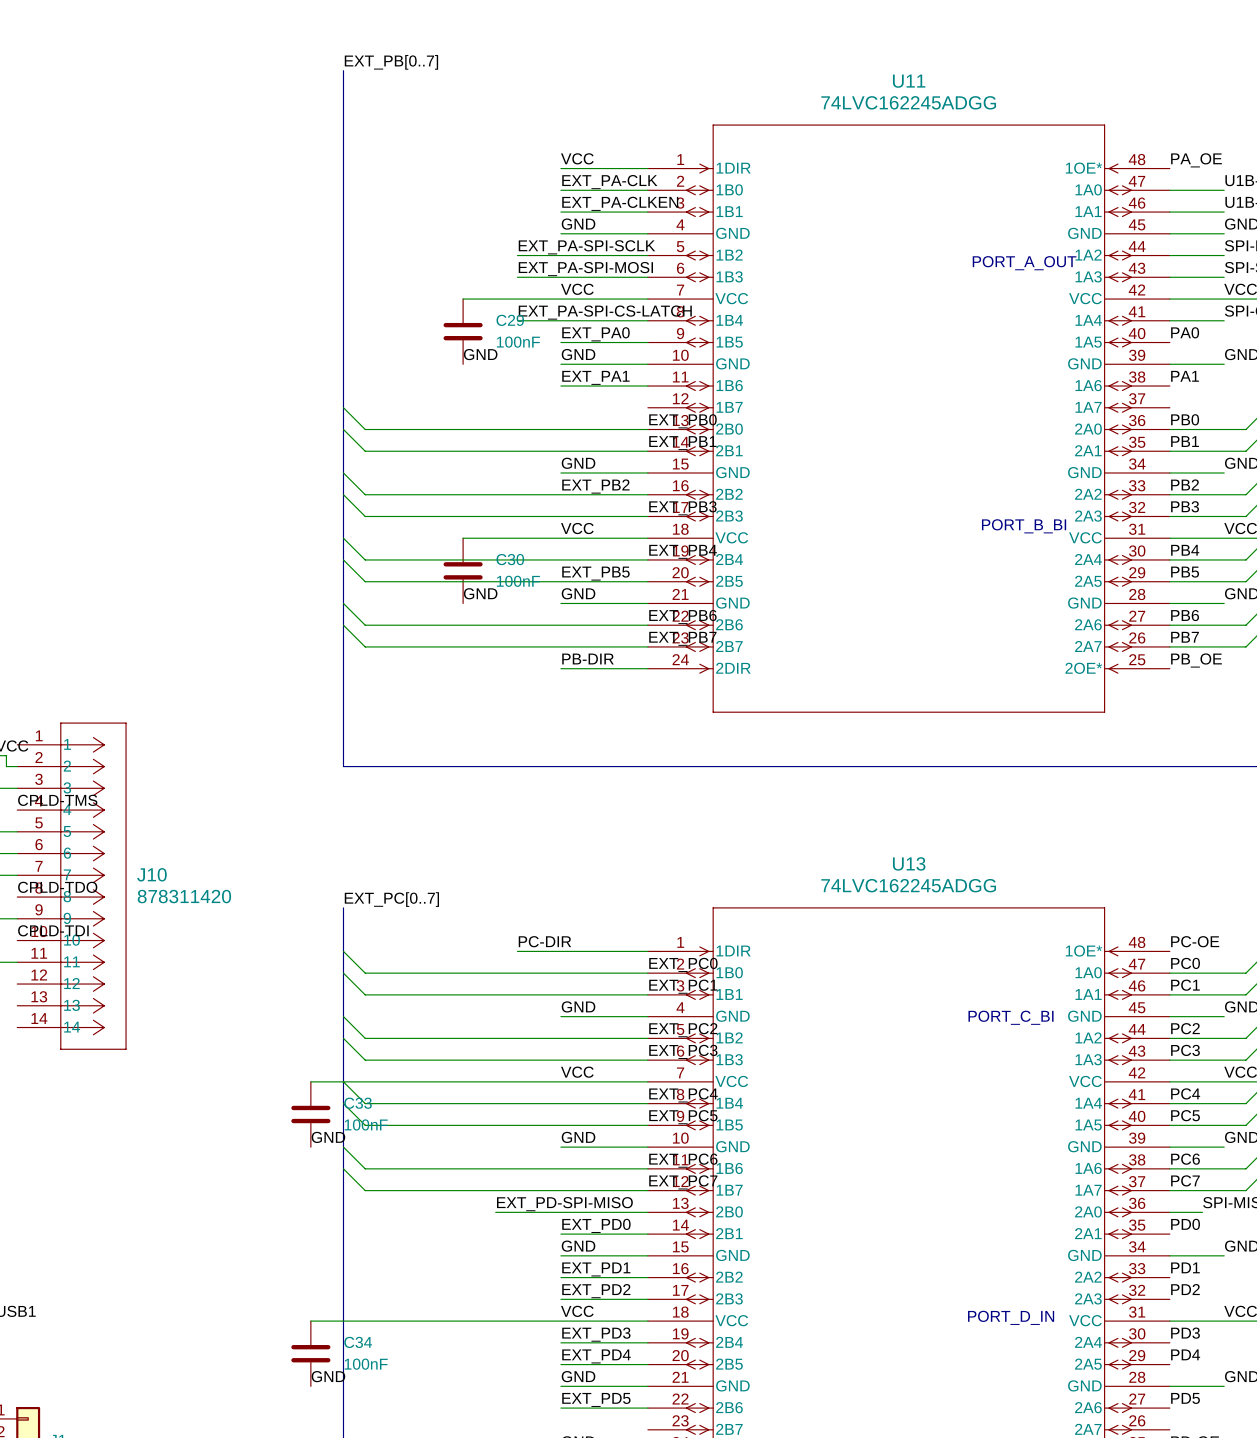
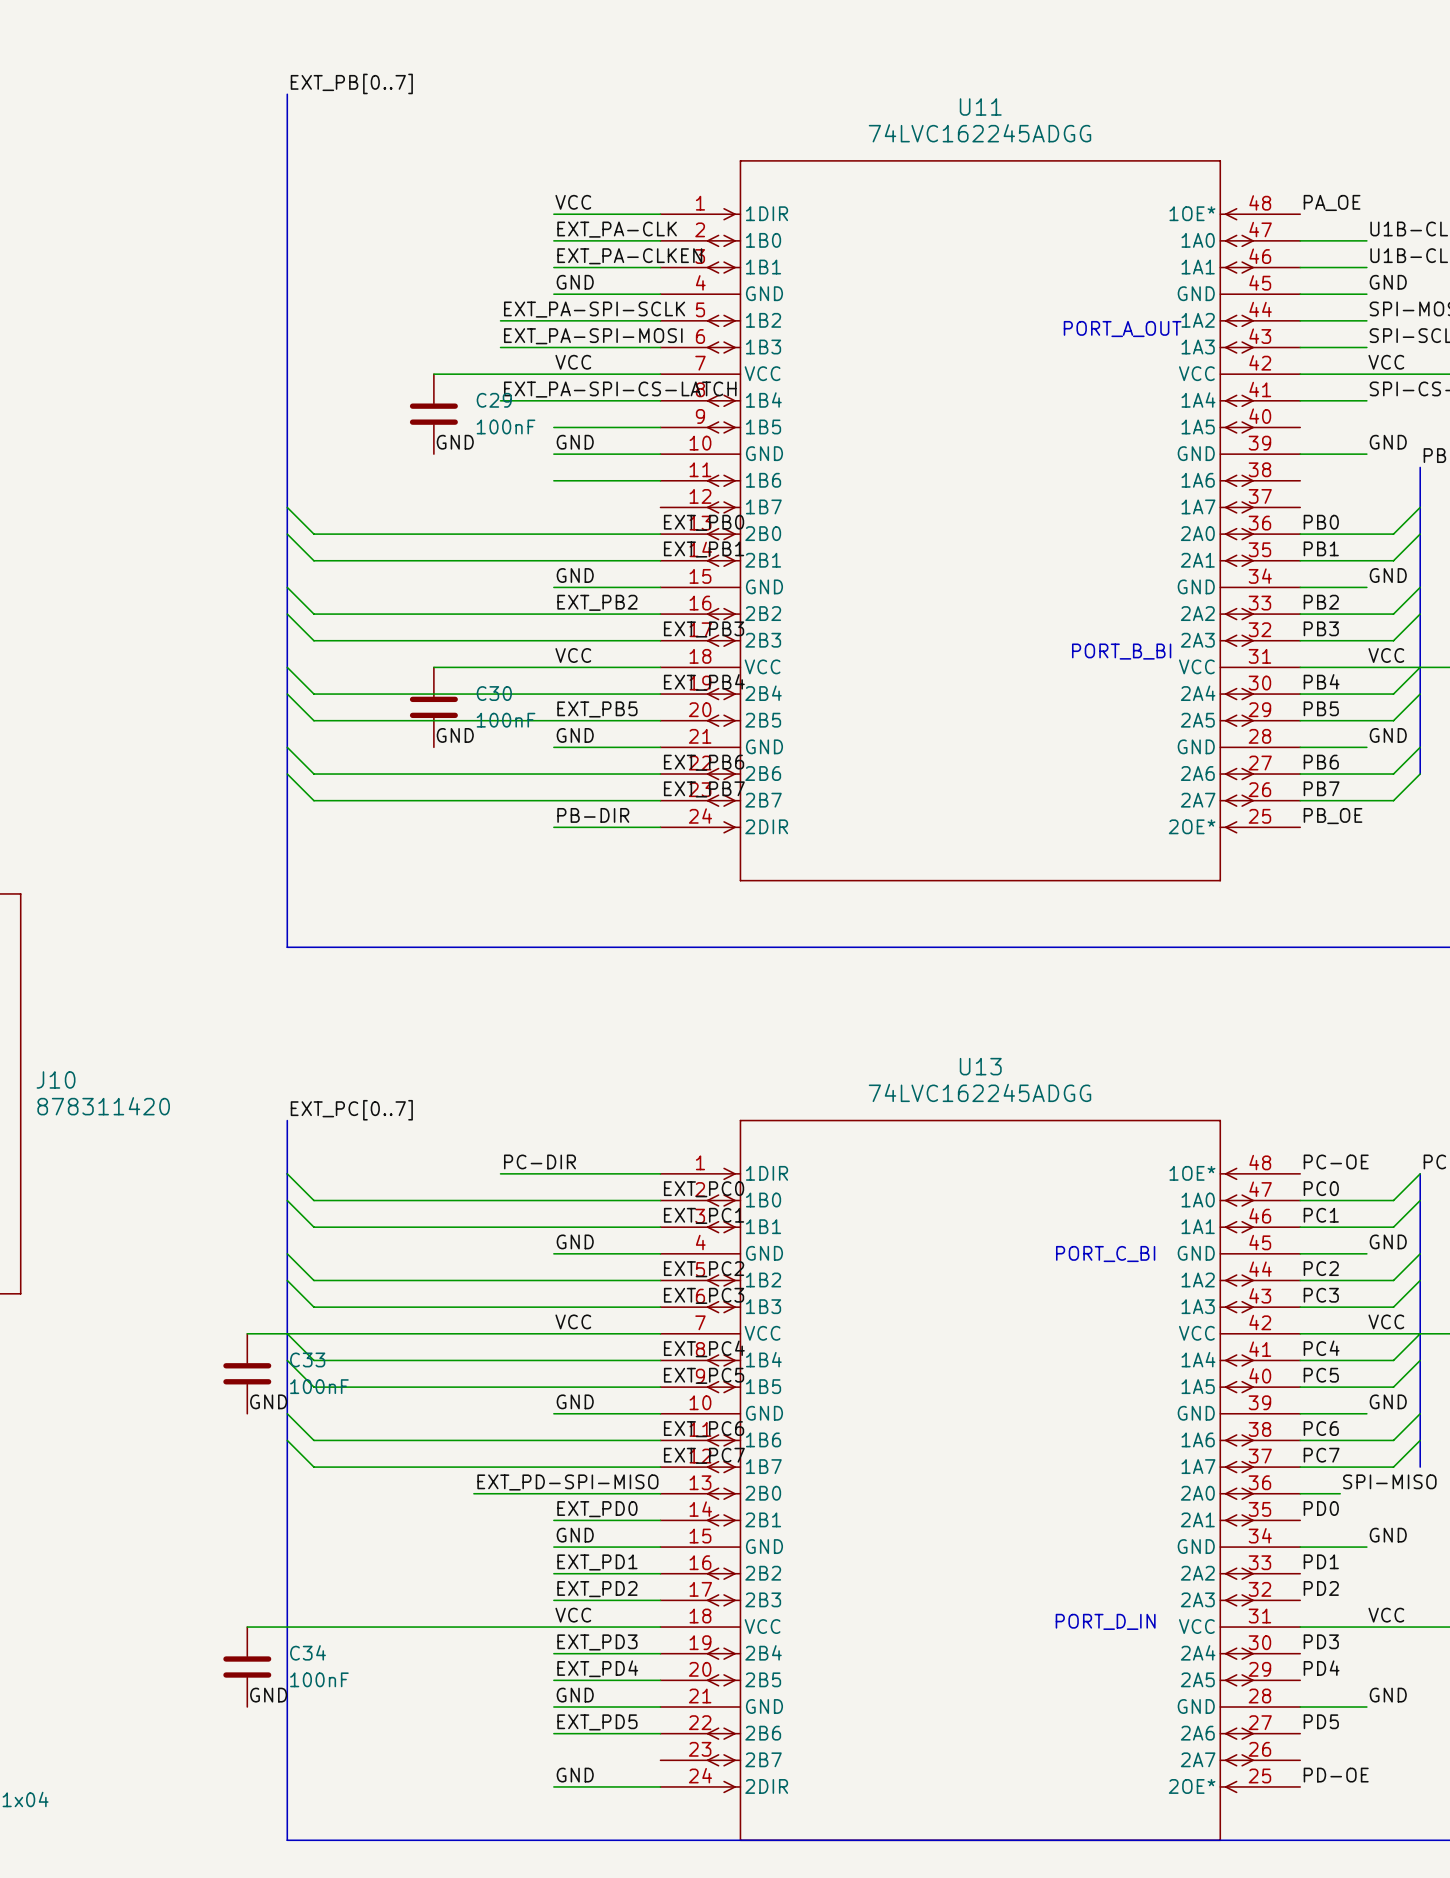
label: PA0 (1185, 332) -> none
label: EXT_PA0 (595, 334) -> none
label: PA1 (1185, 376) -> none
label: EXT_PA1 (595, 377) -> none

